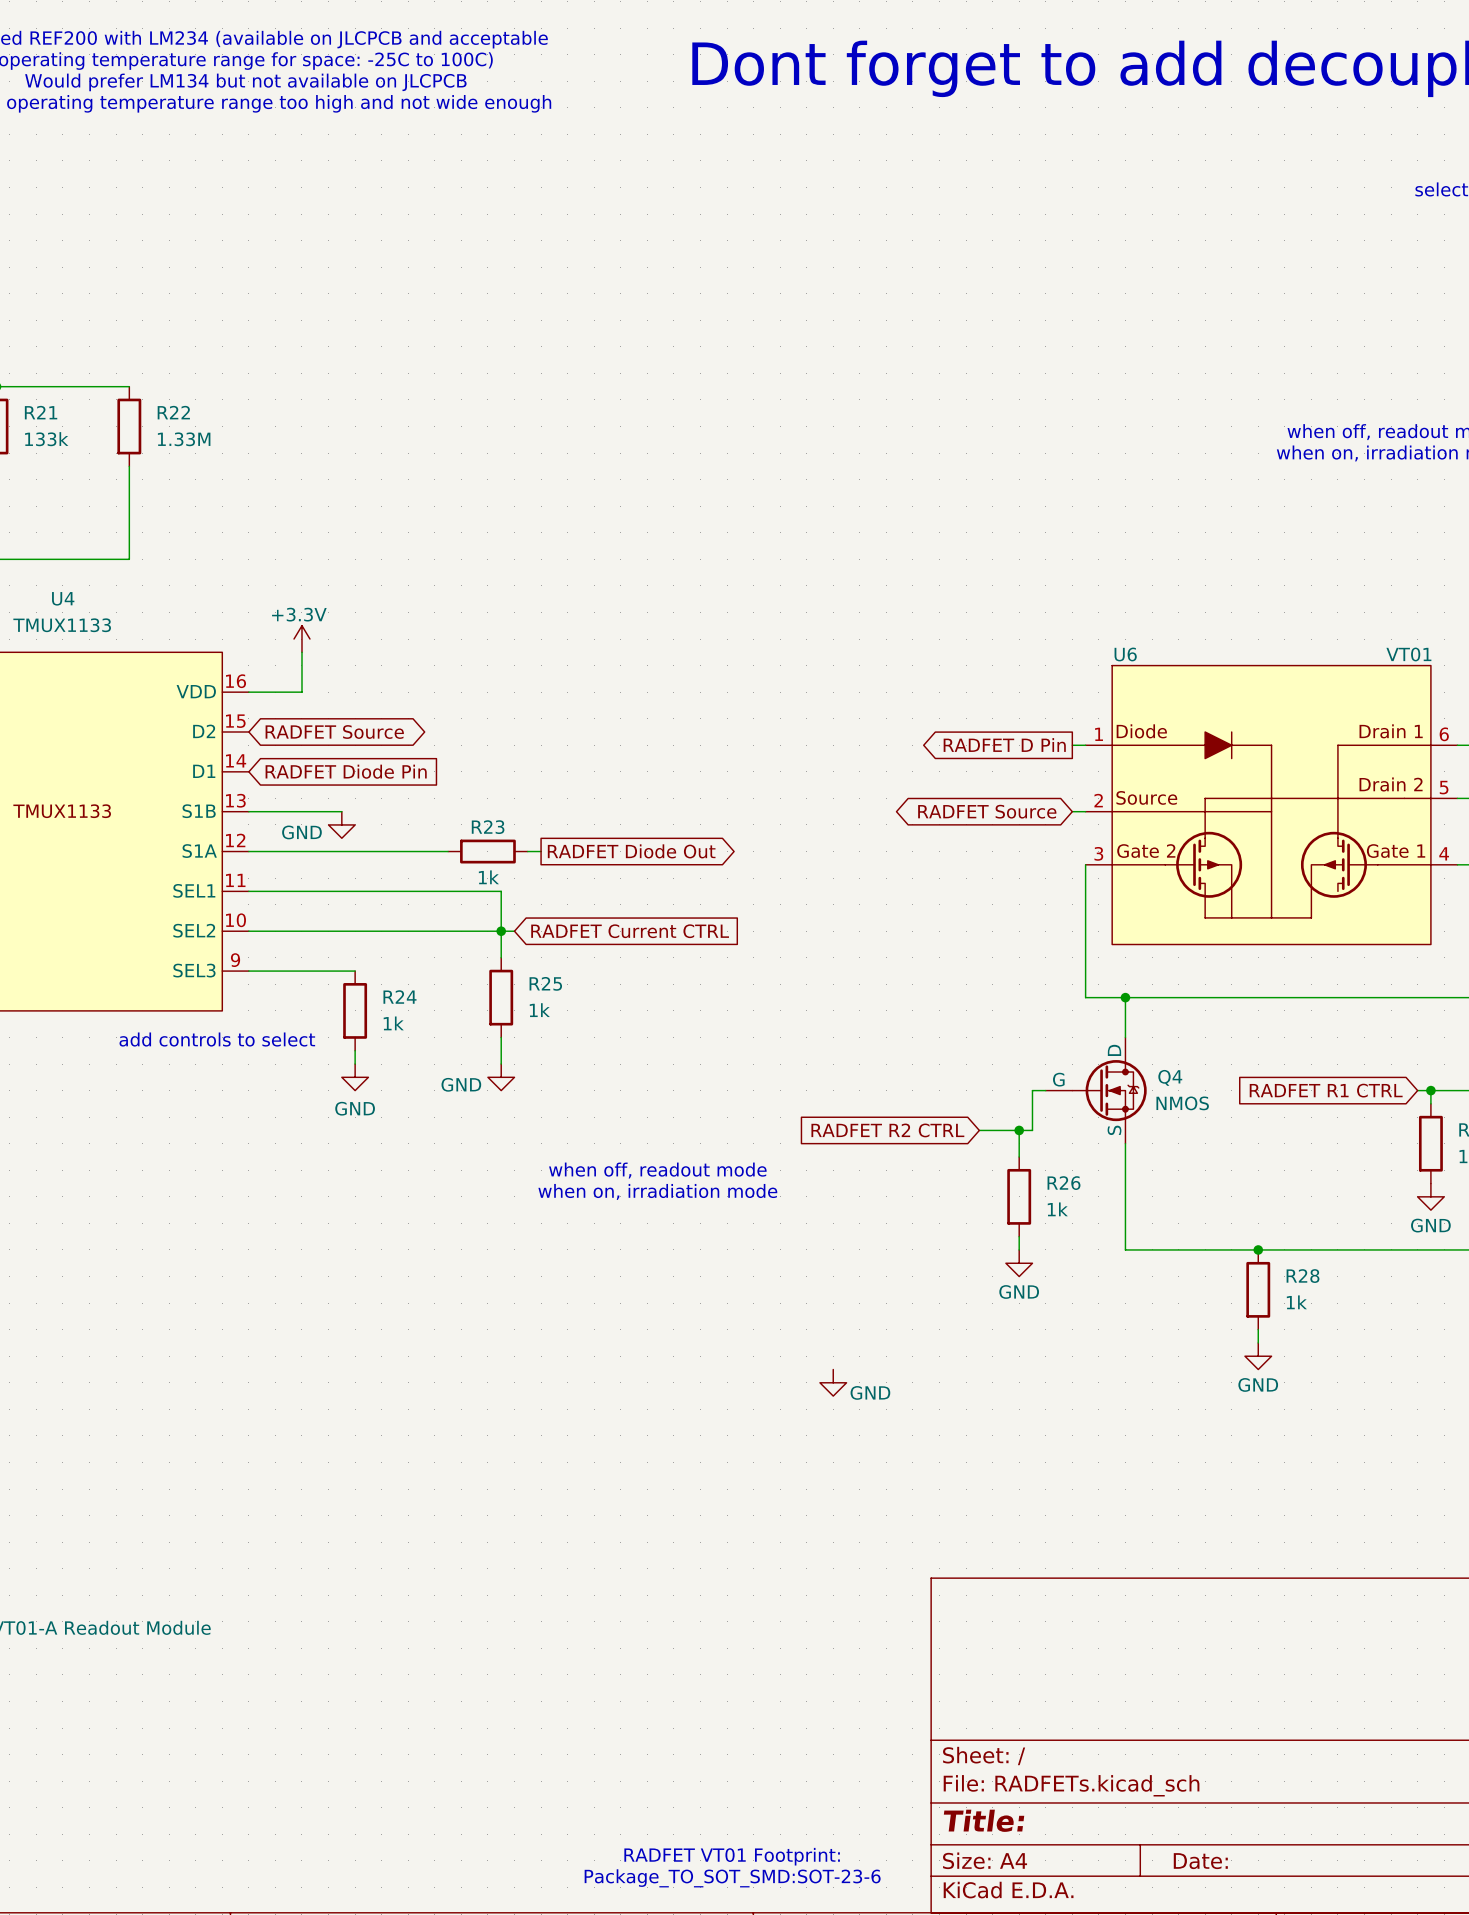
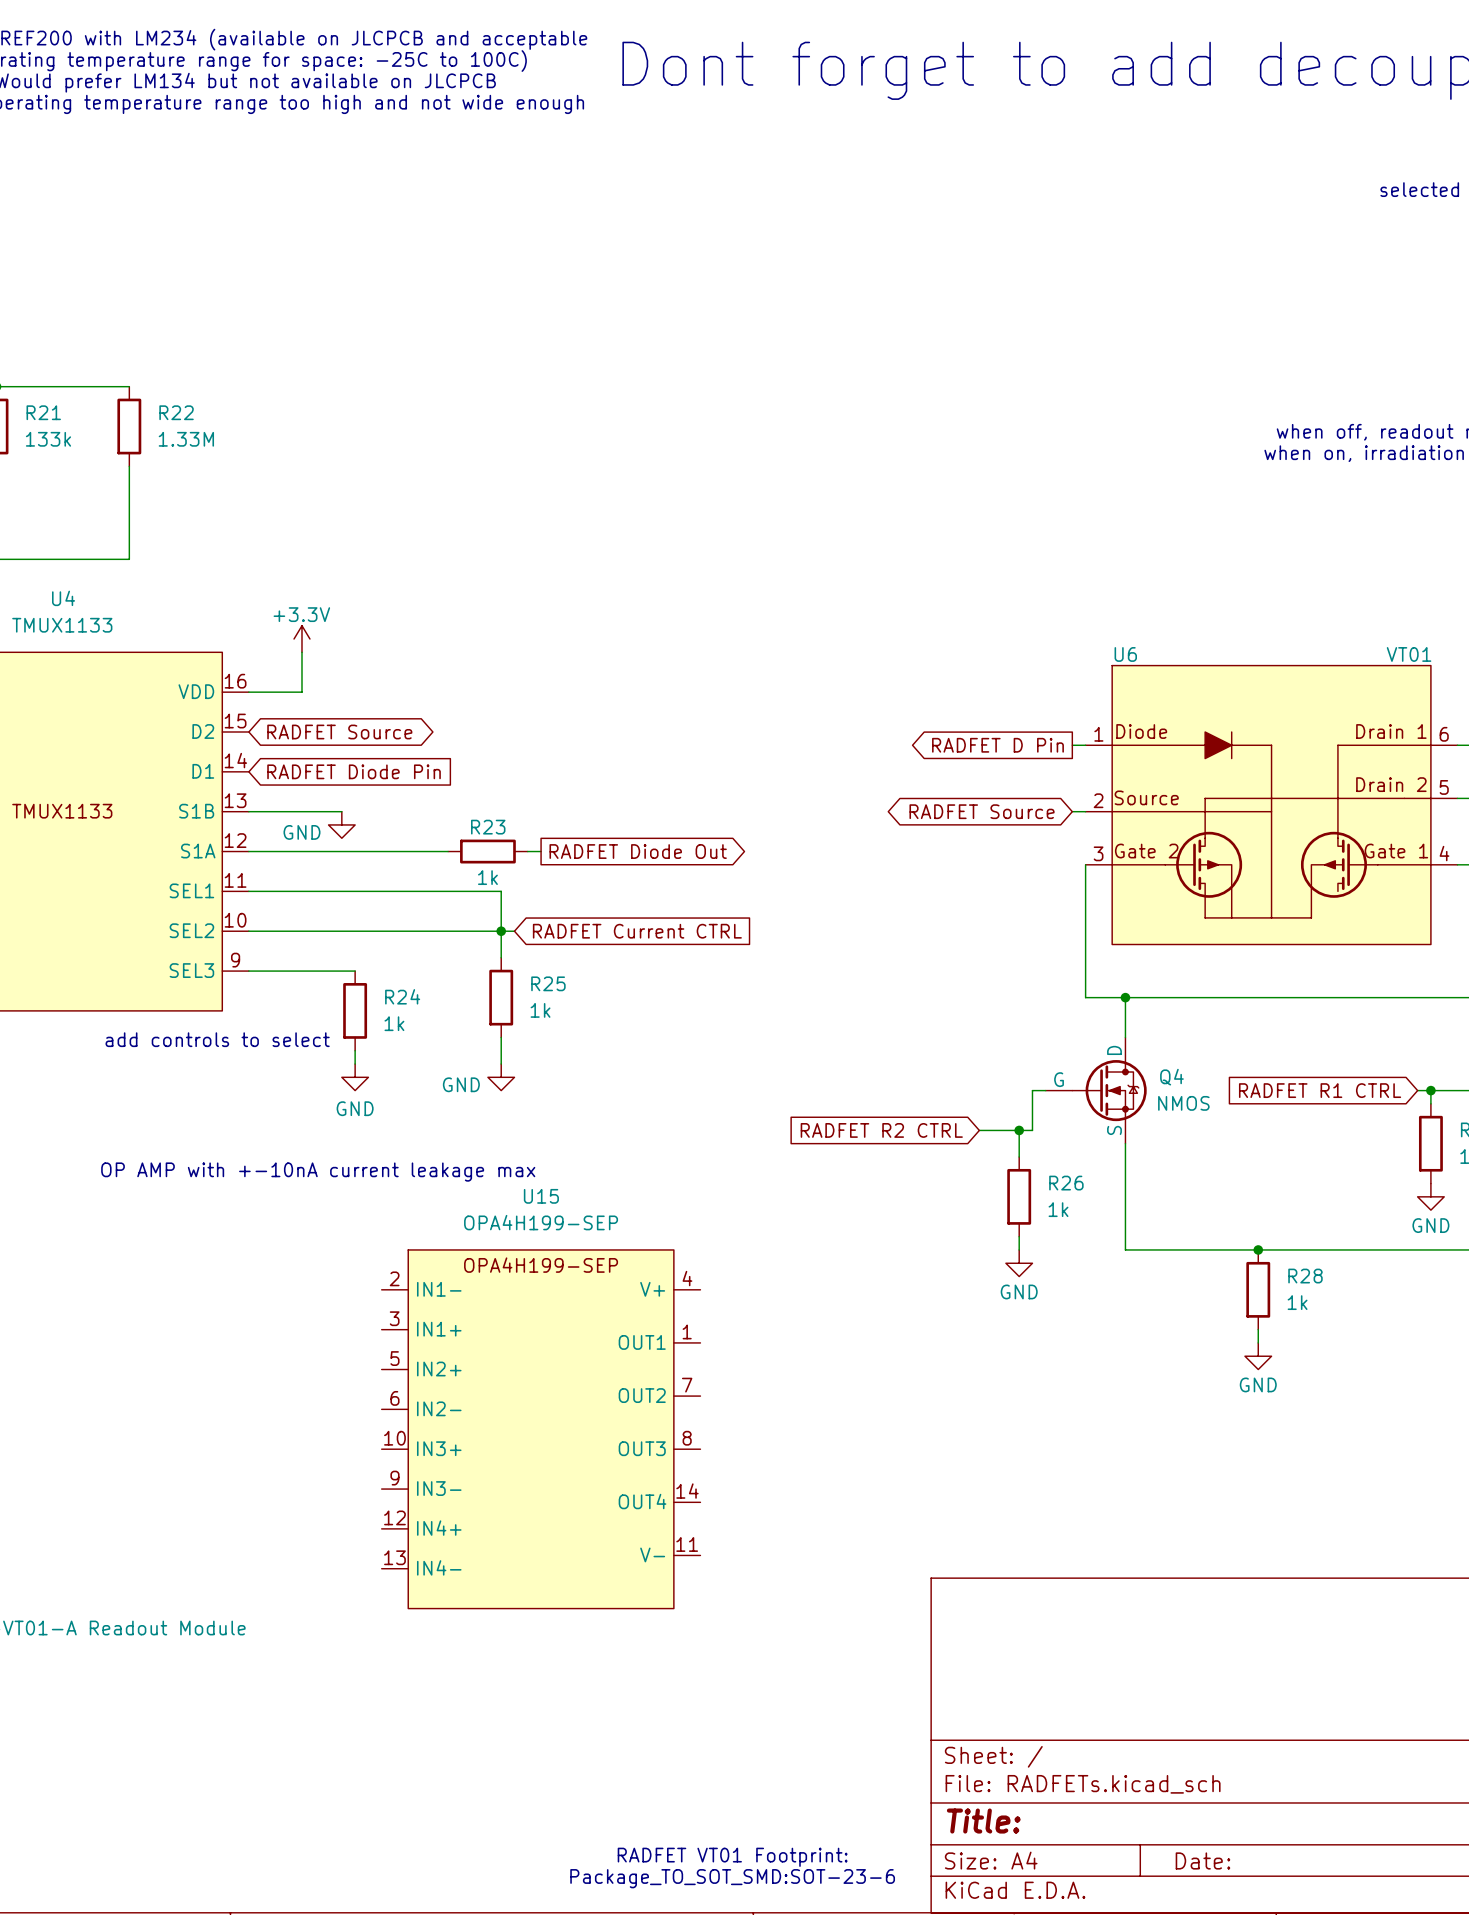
text: when off, readout mode (657, 1170) -> none
text: none -> OP AMP with +-10nA current leakage max (318, 1172)
text: when on, irradiation mode (657, 1191) -> none
power symbol: GND (833, 1382) -> none
U15: none -> OPA4H199-SEP (541, 1429)

